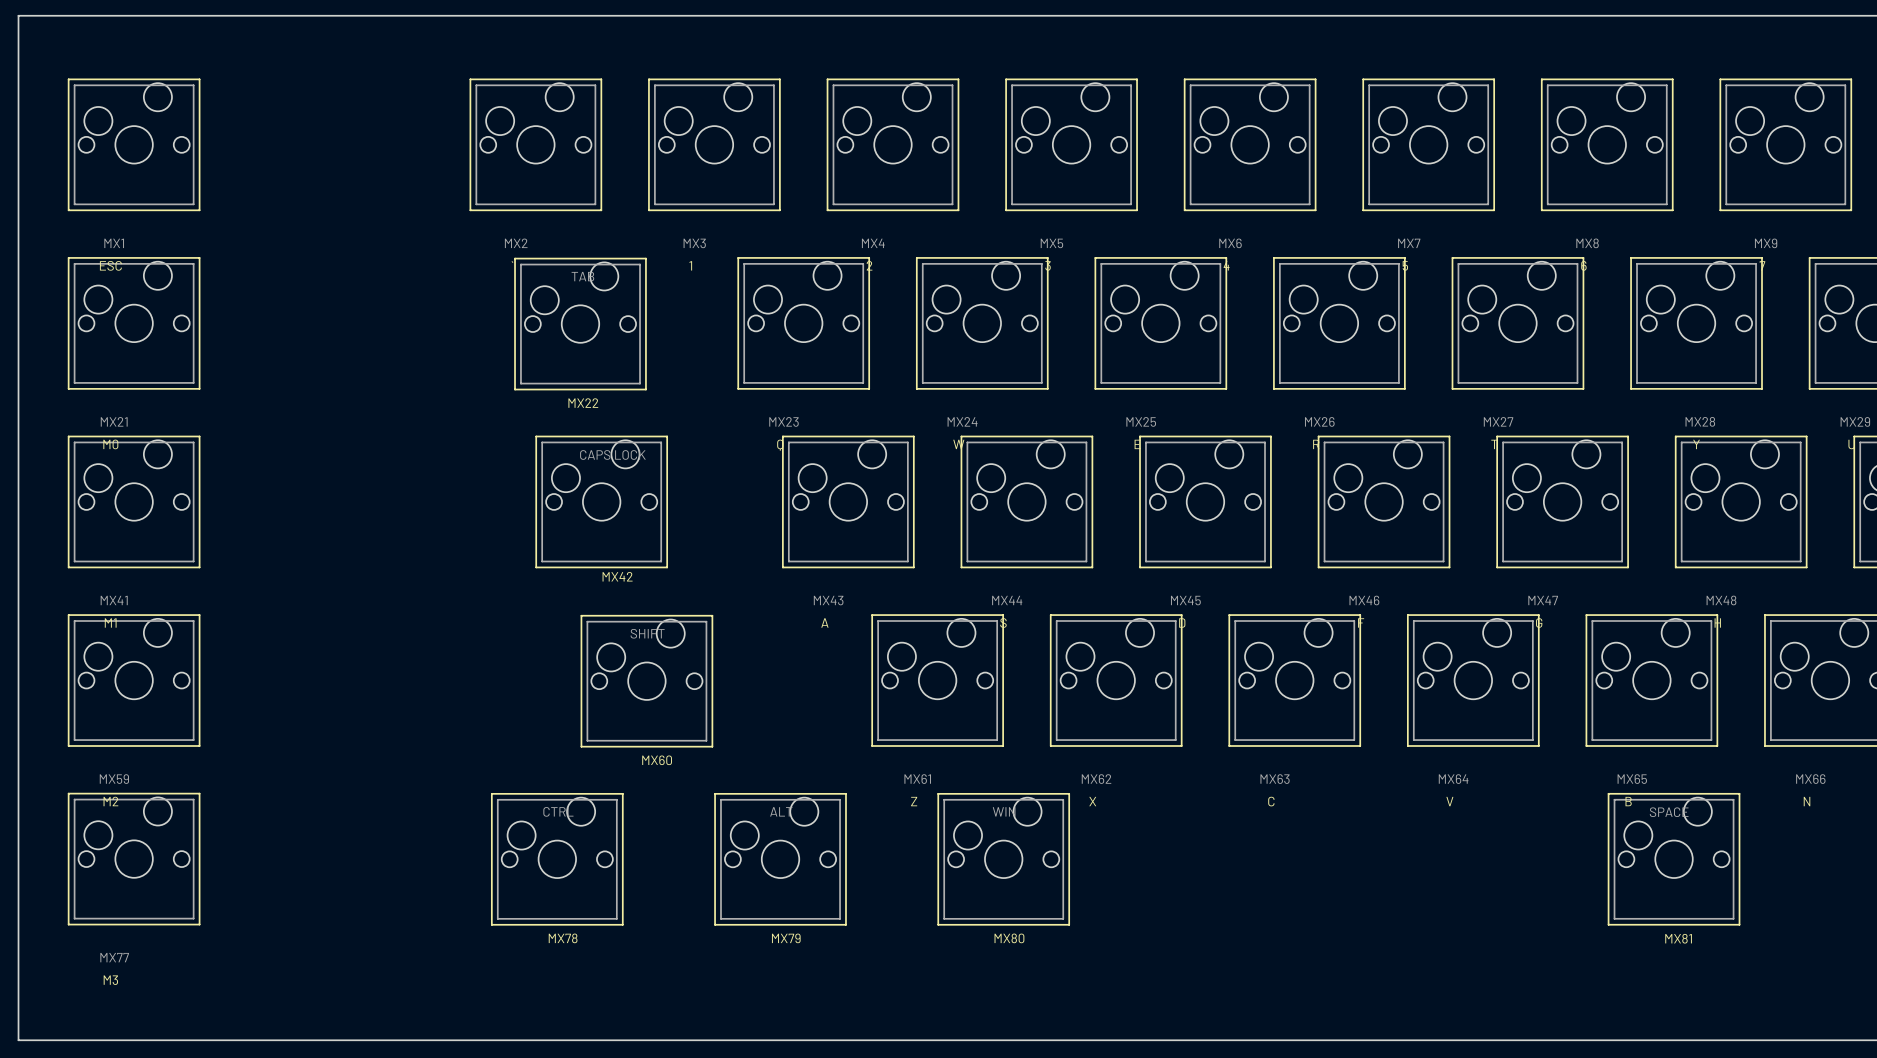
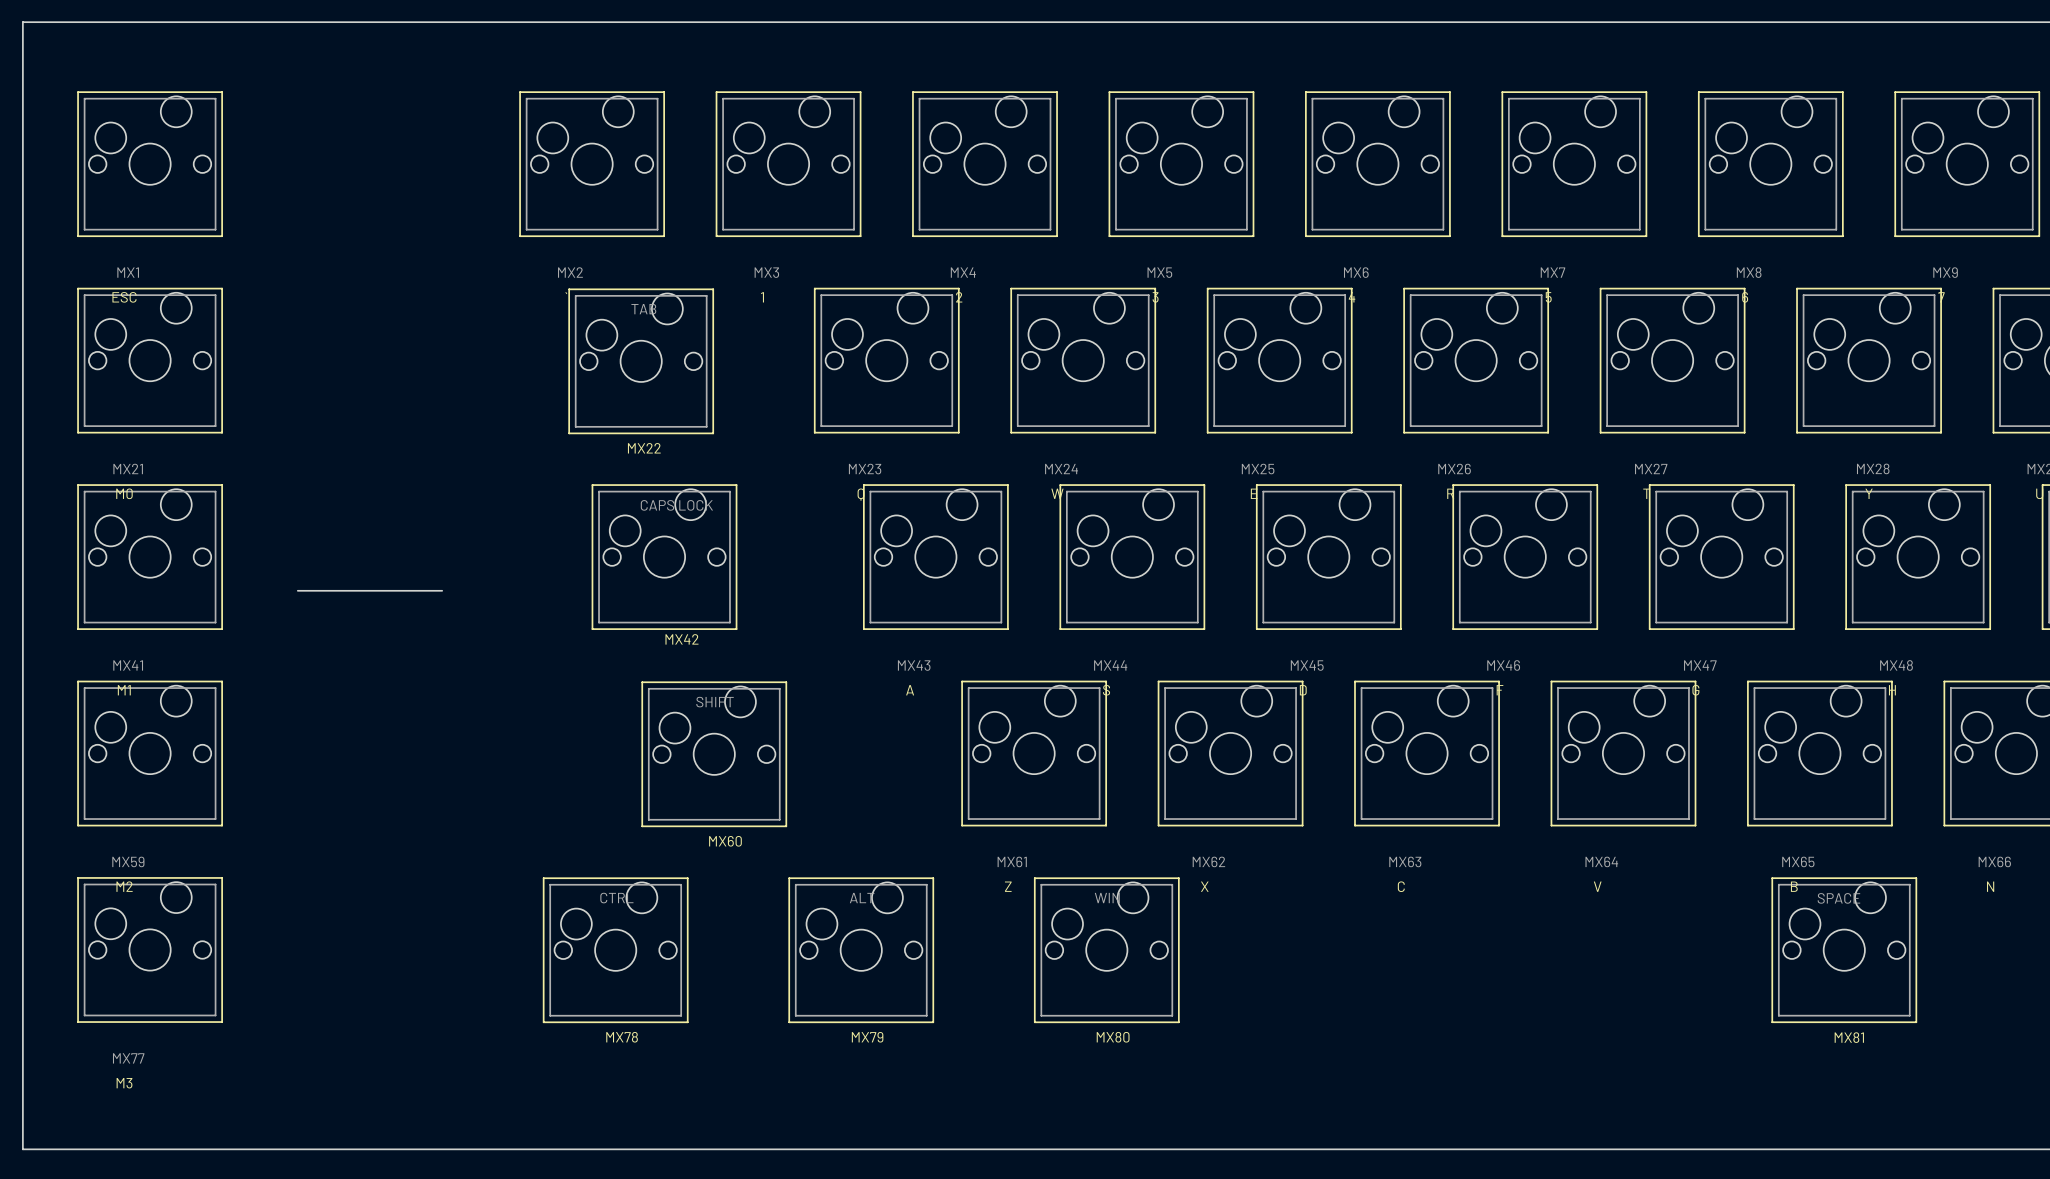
part: none -> (369, 590)

